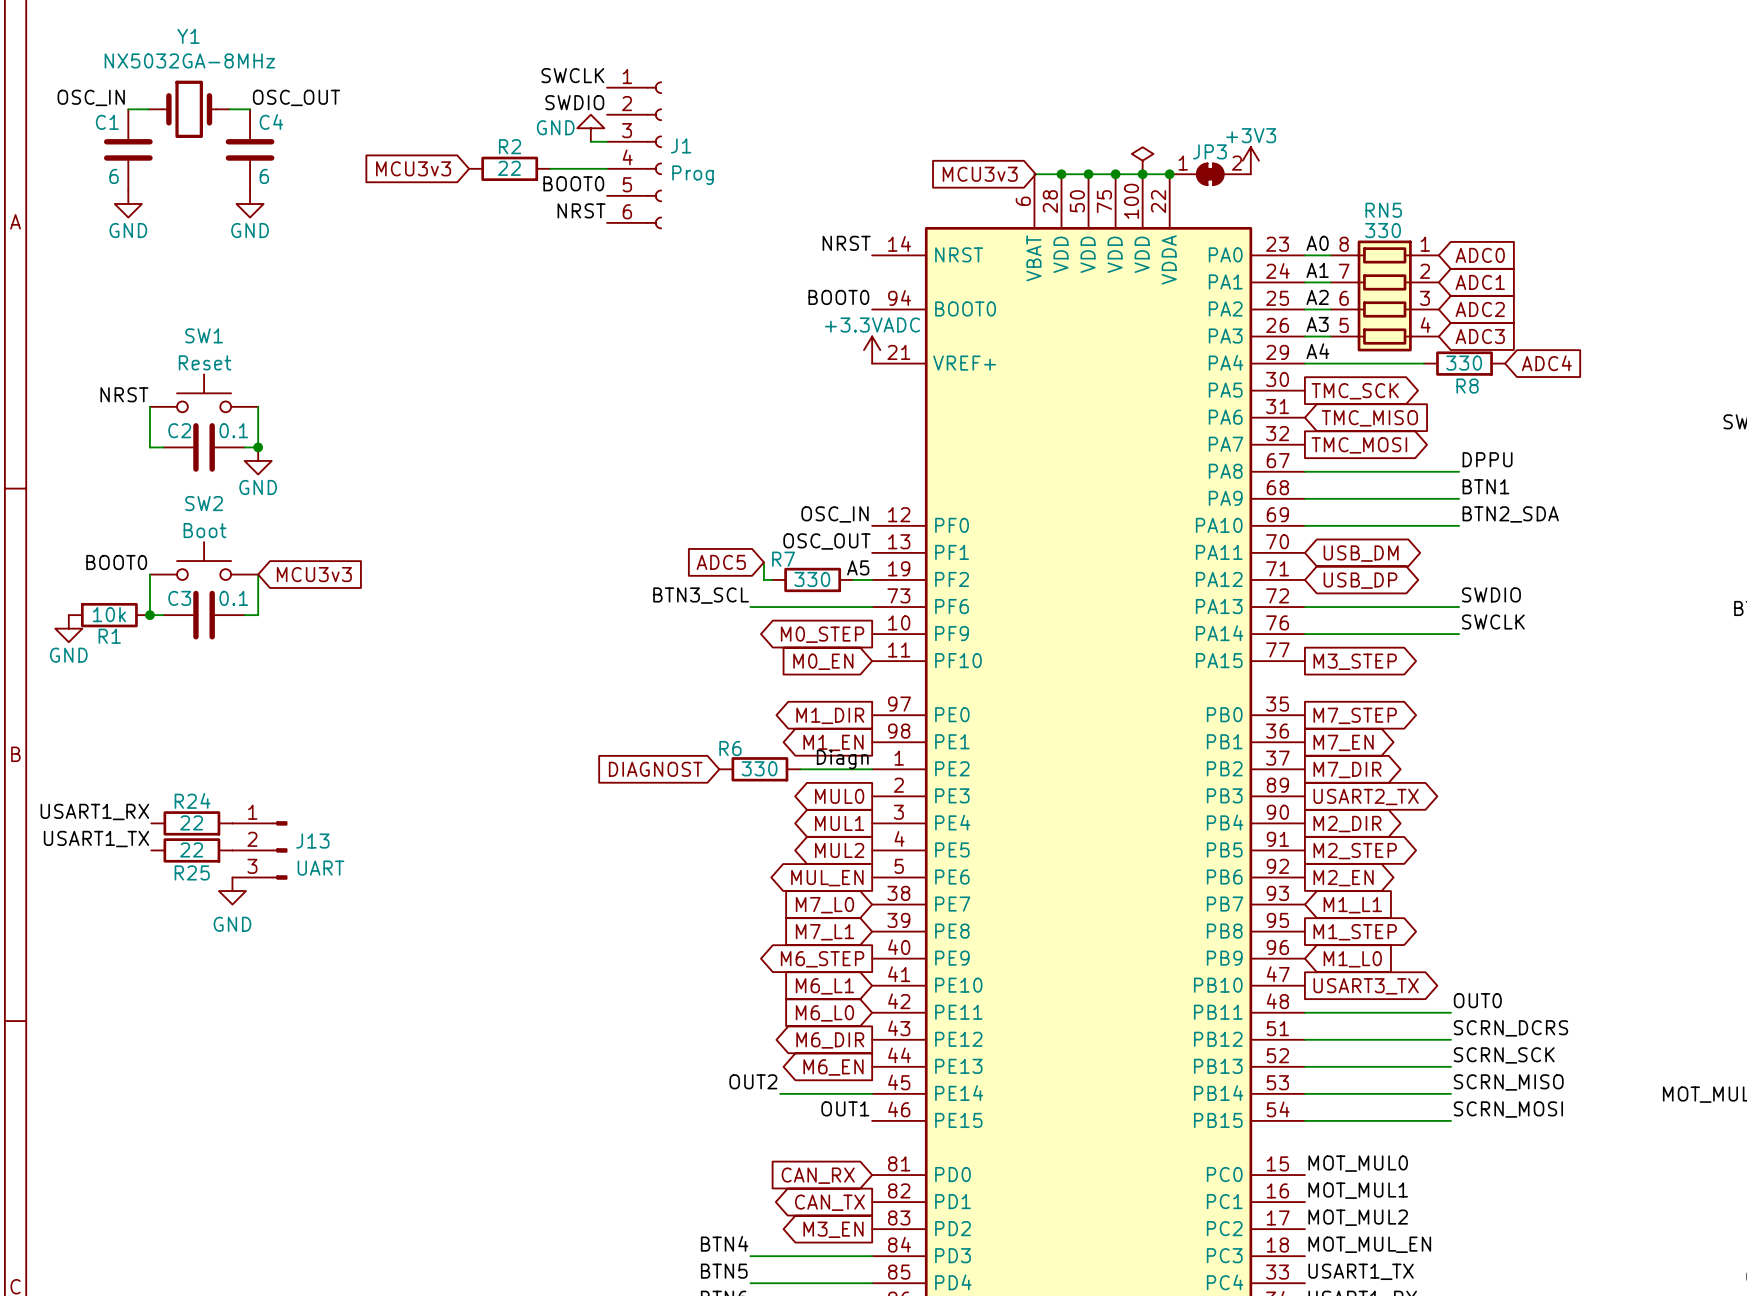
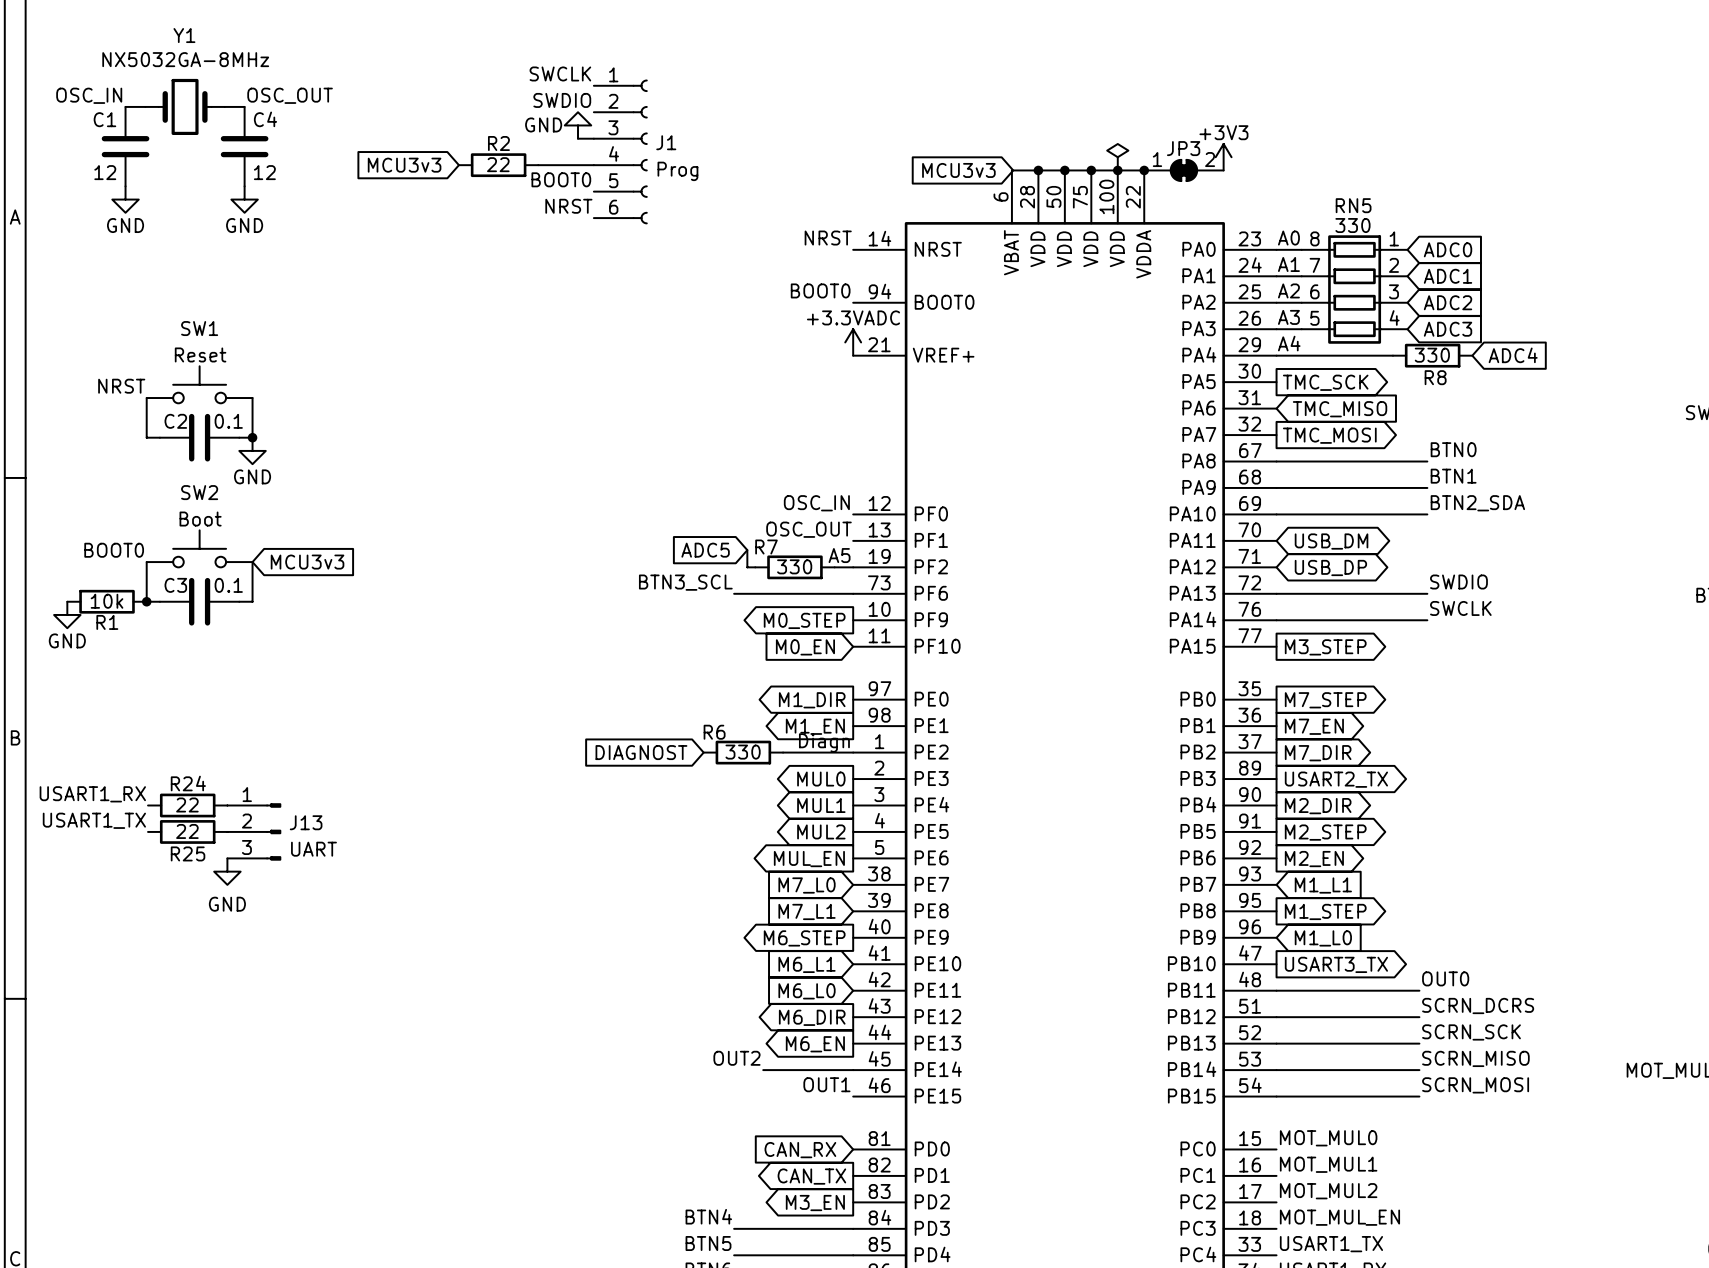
C1 value: 6 (114, 176) -> 12 (105, 172)
C4 value: 6 (264, 176) -> 12 (264, 172)
label: DPPU (1487, 459) -> BTN0 (1453, 449)

